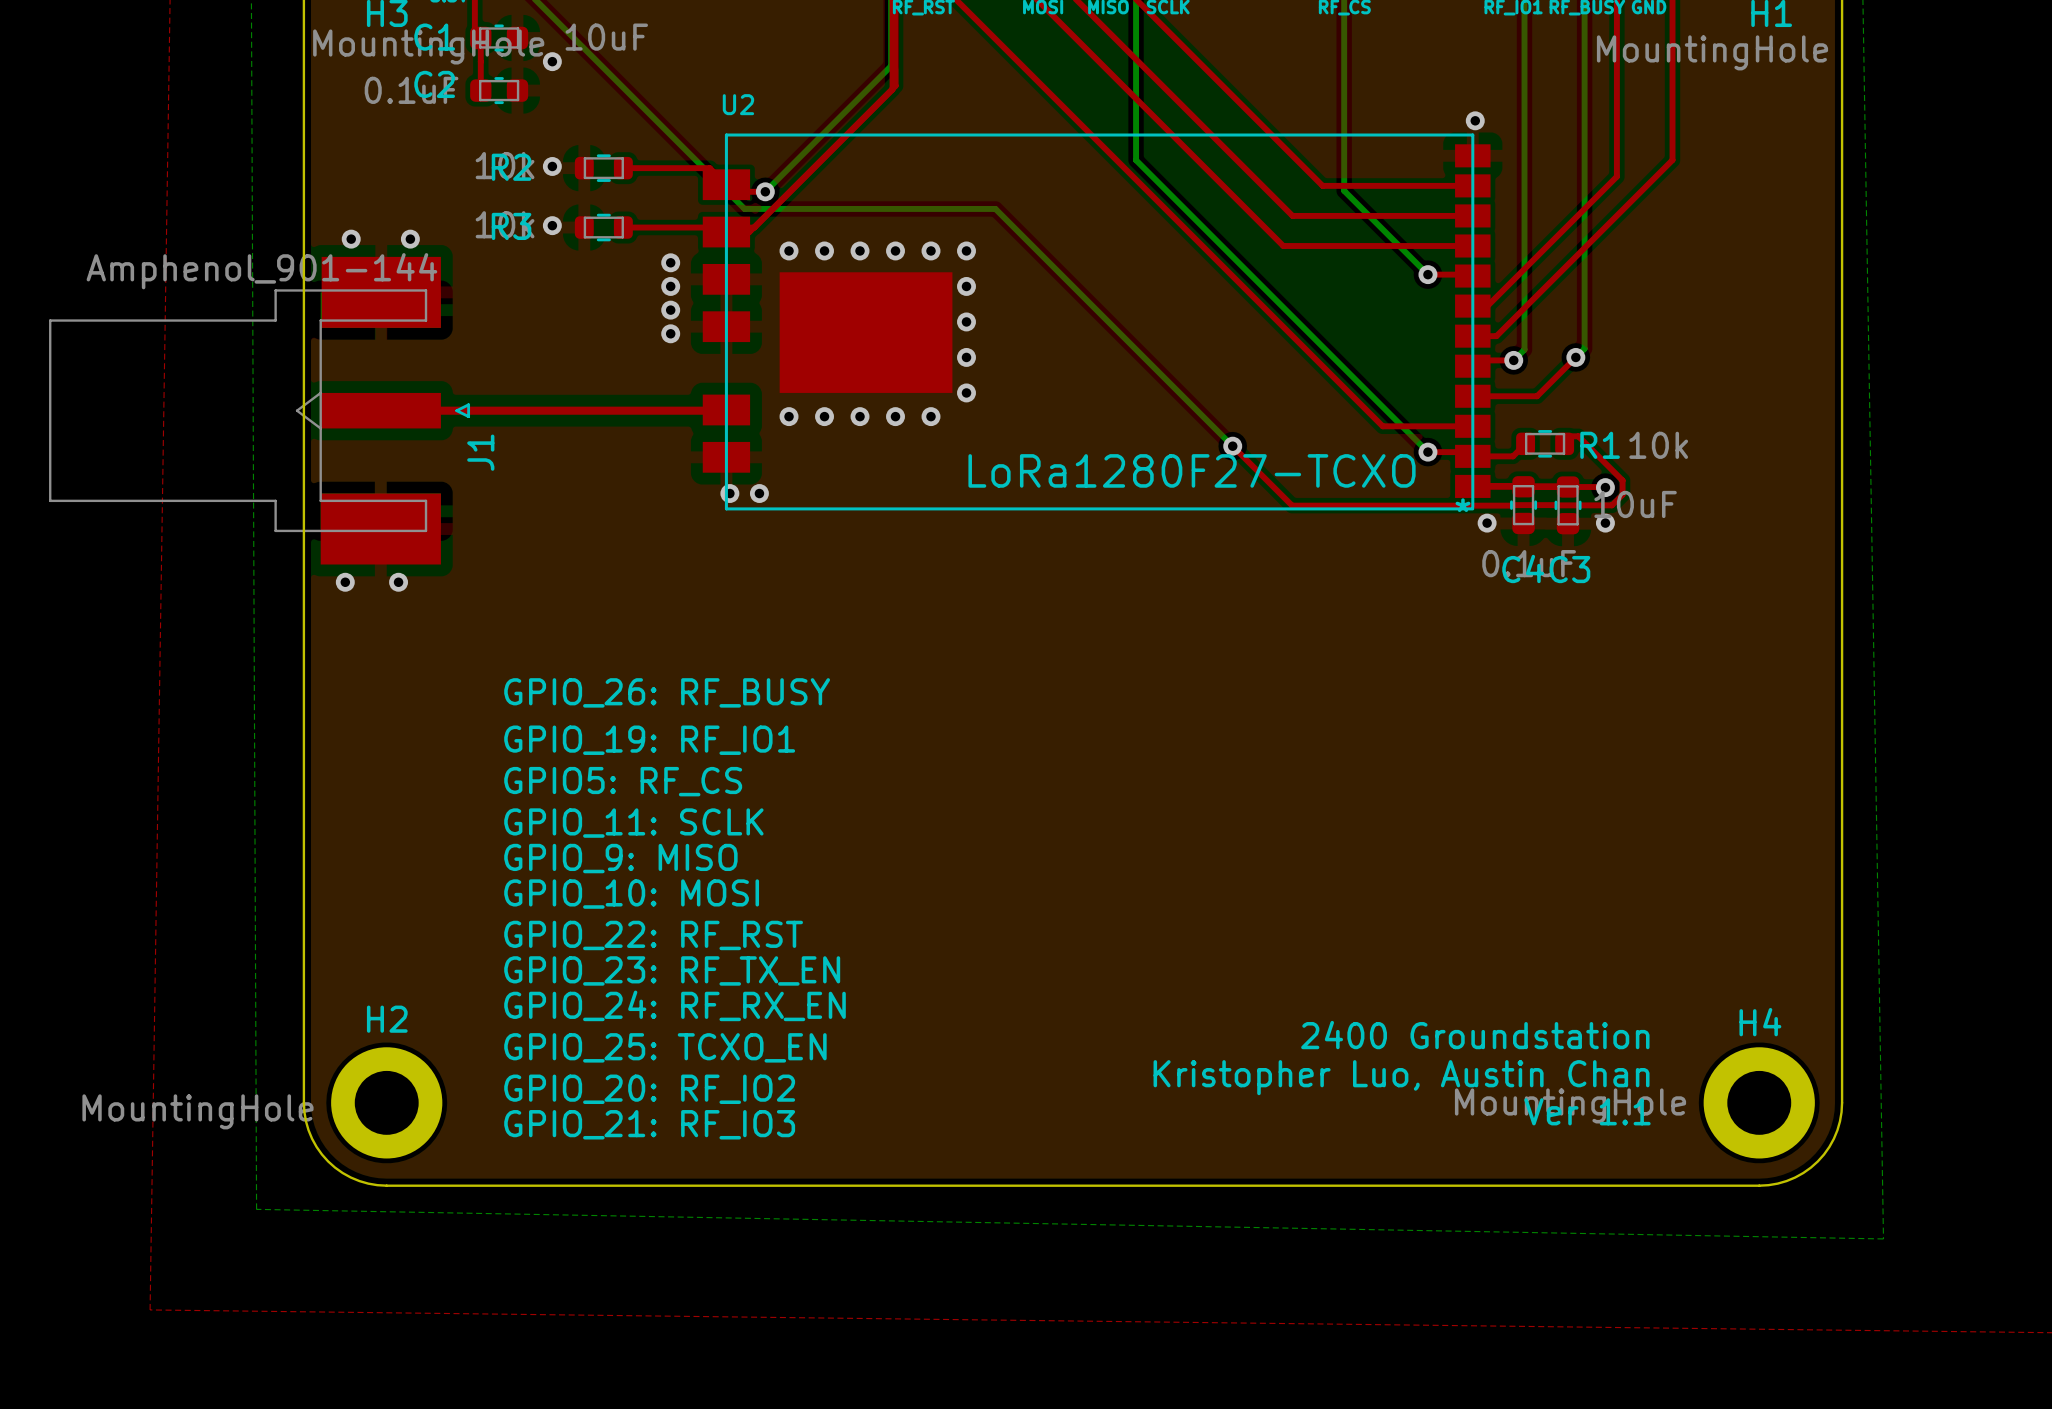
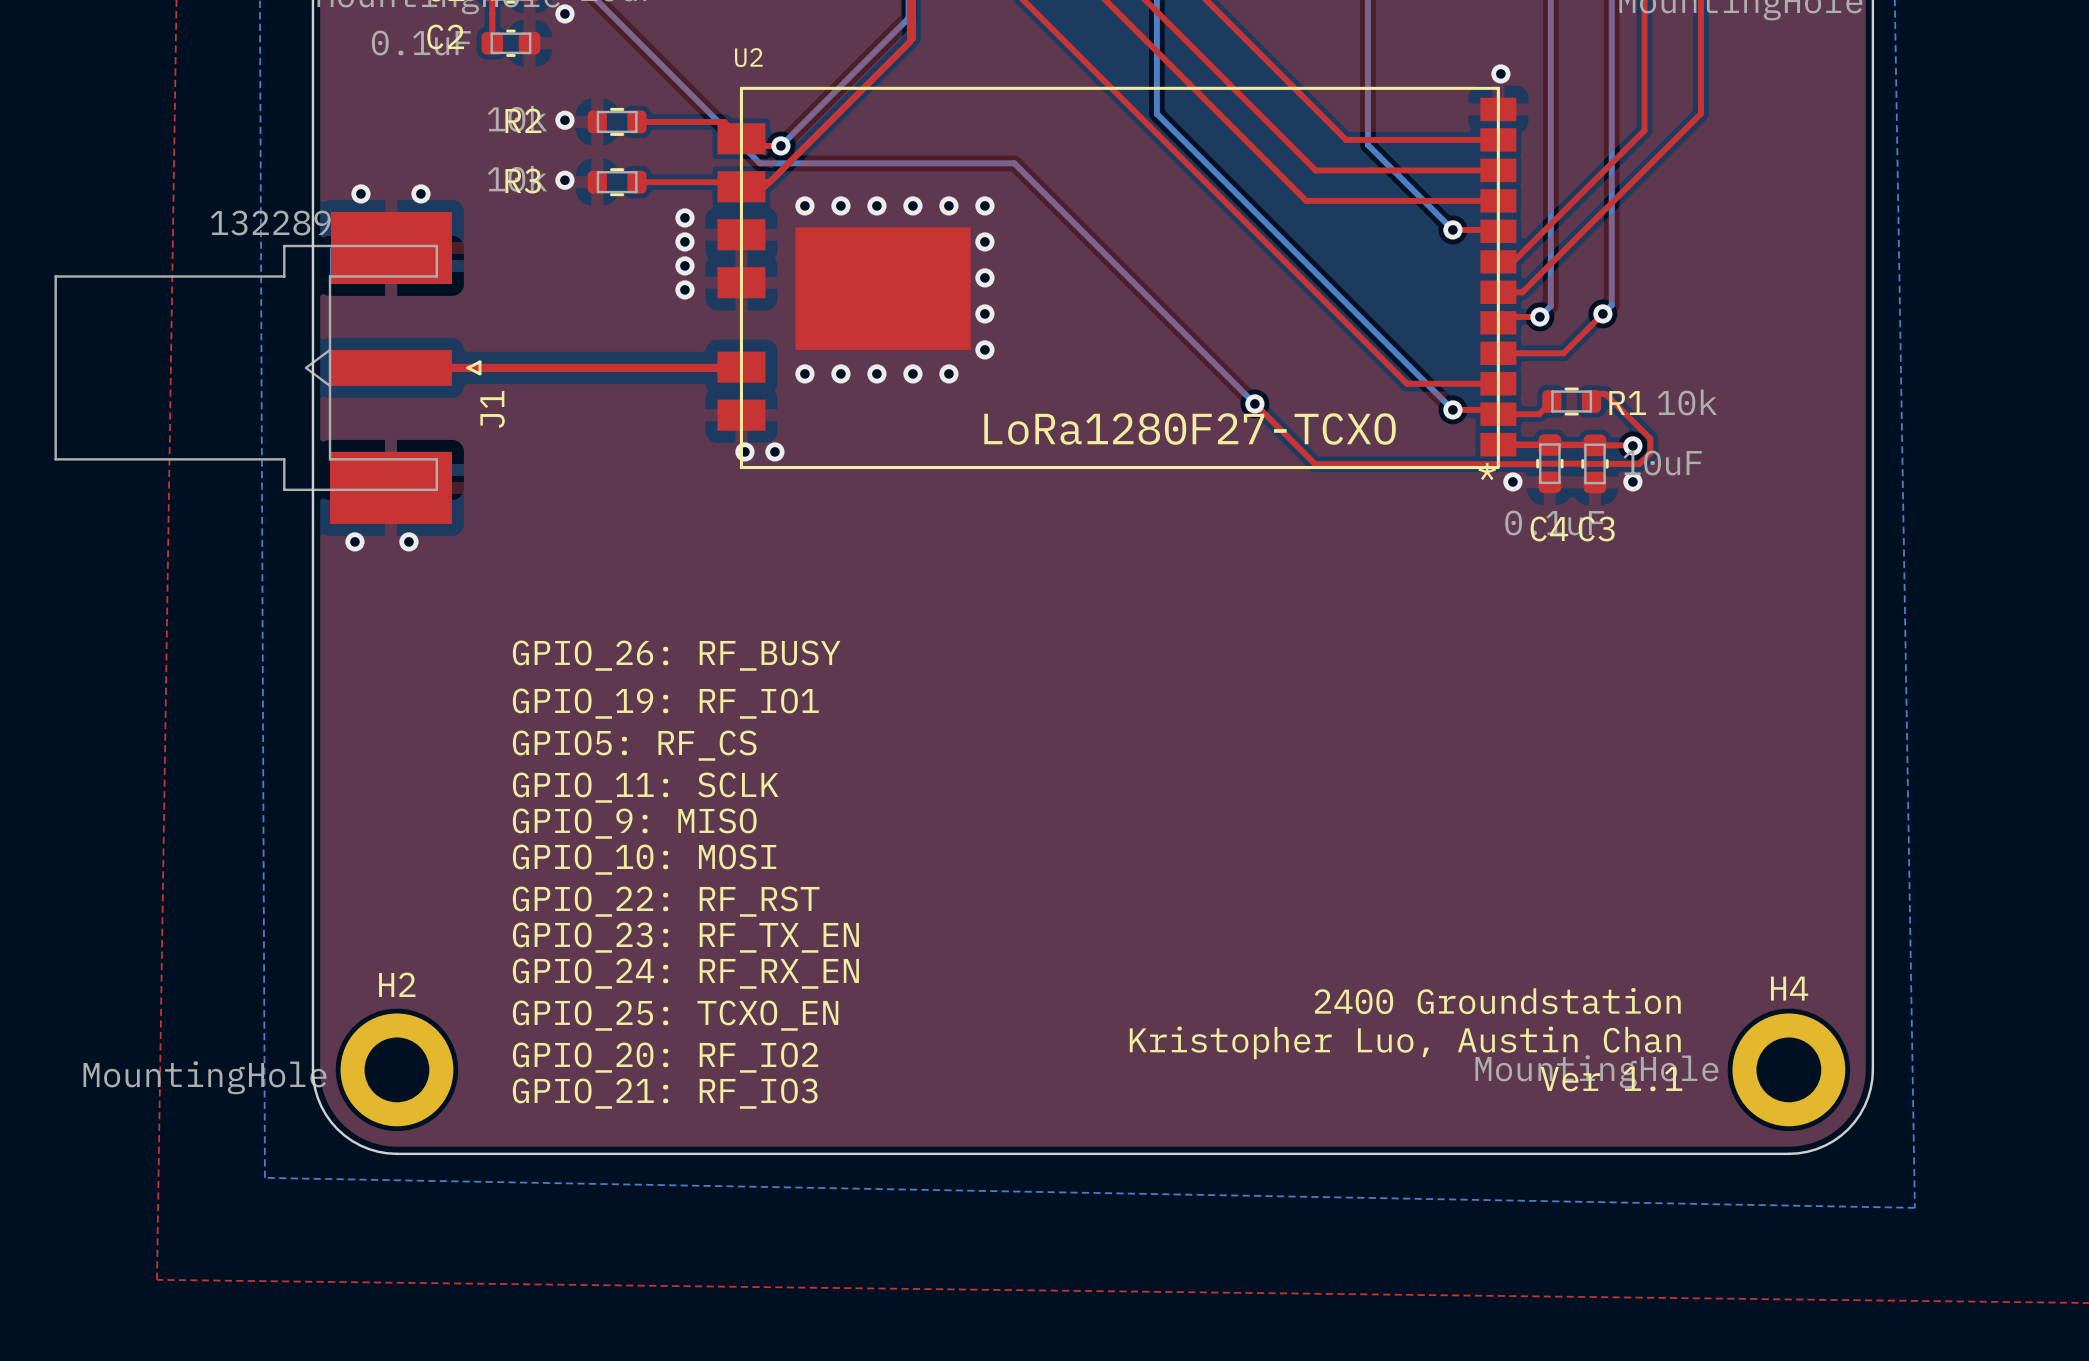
J1 value: Amphenol_901-144 (261, 271) -> 132289 (270, 223)

